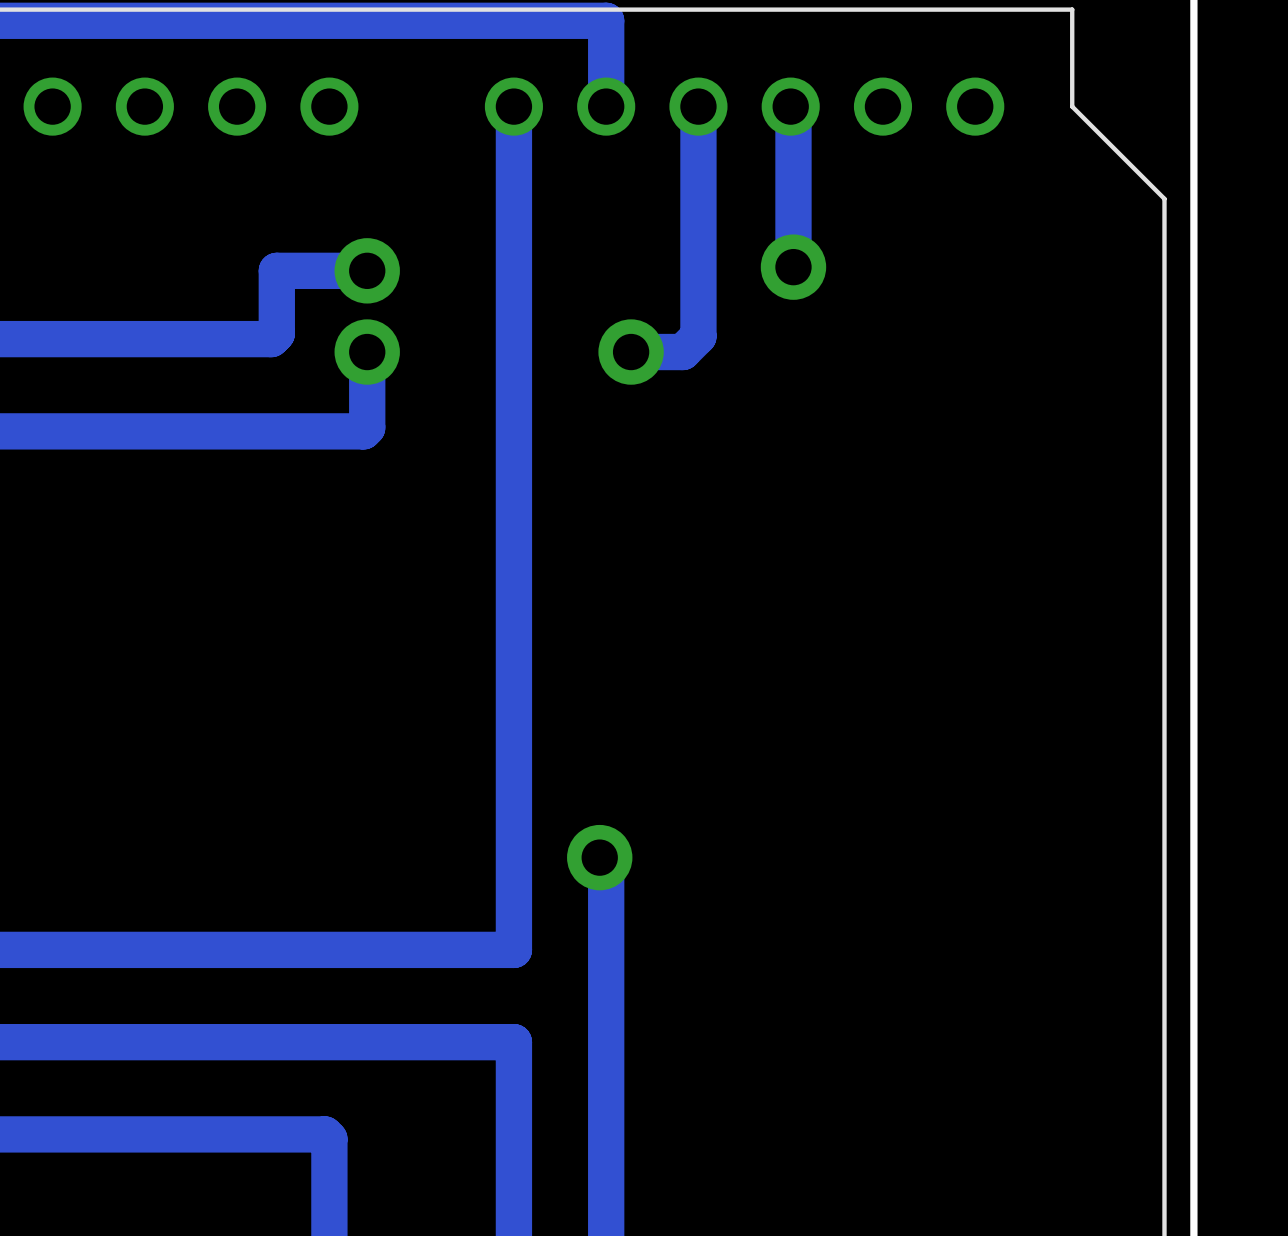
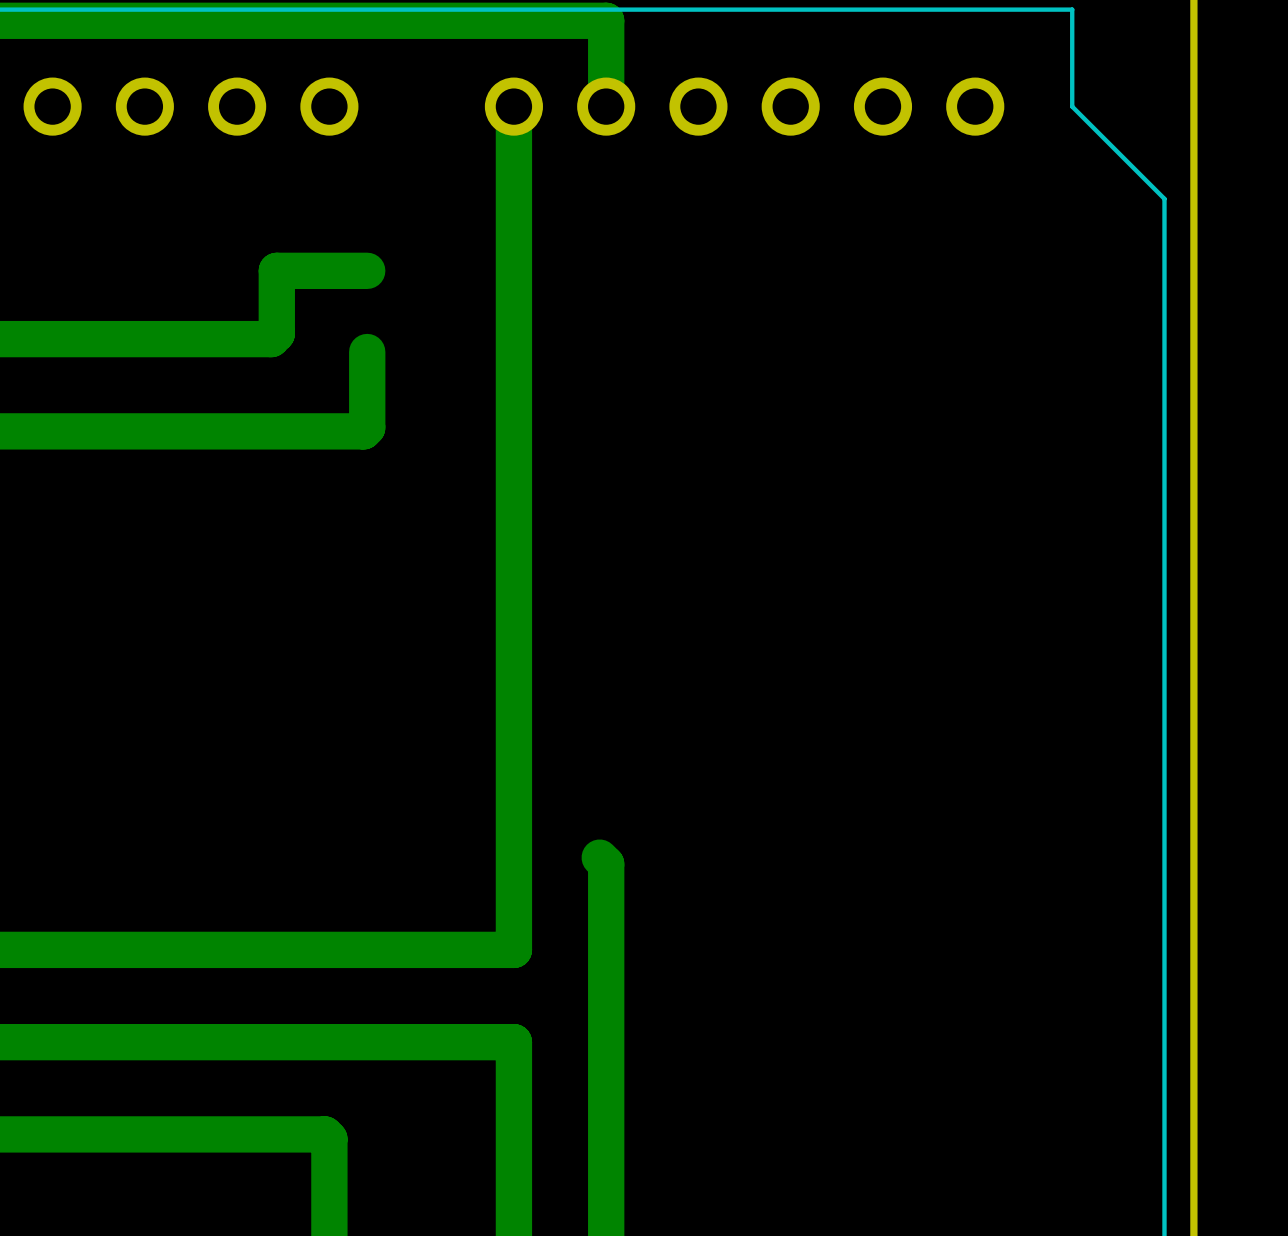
track: (698, 106) (698, 336) (682, 352) (631, 352) -> none
track: (790, 106) (793, 109) (793, 267) -> none
via: (793, 267) -> none
via: (367, 270) -> none
via: (367, 352) -> none
via: (631, 352) -> none
via: (599, 857) -> none

